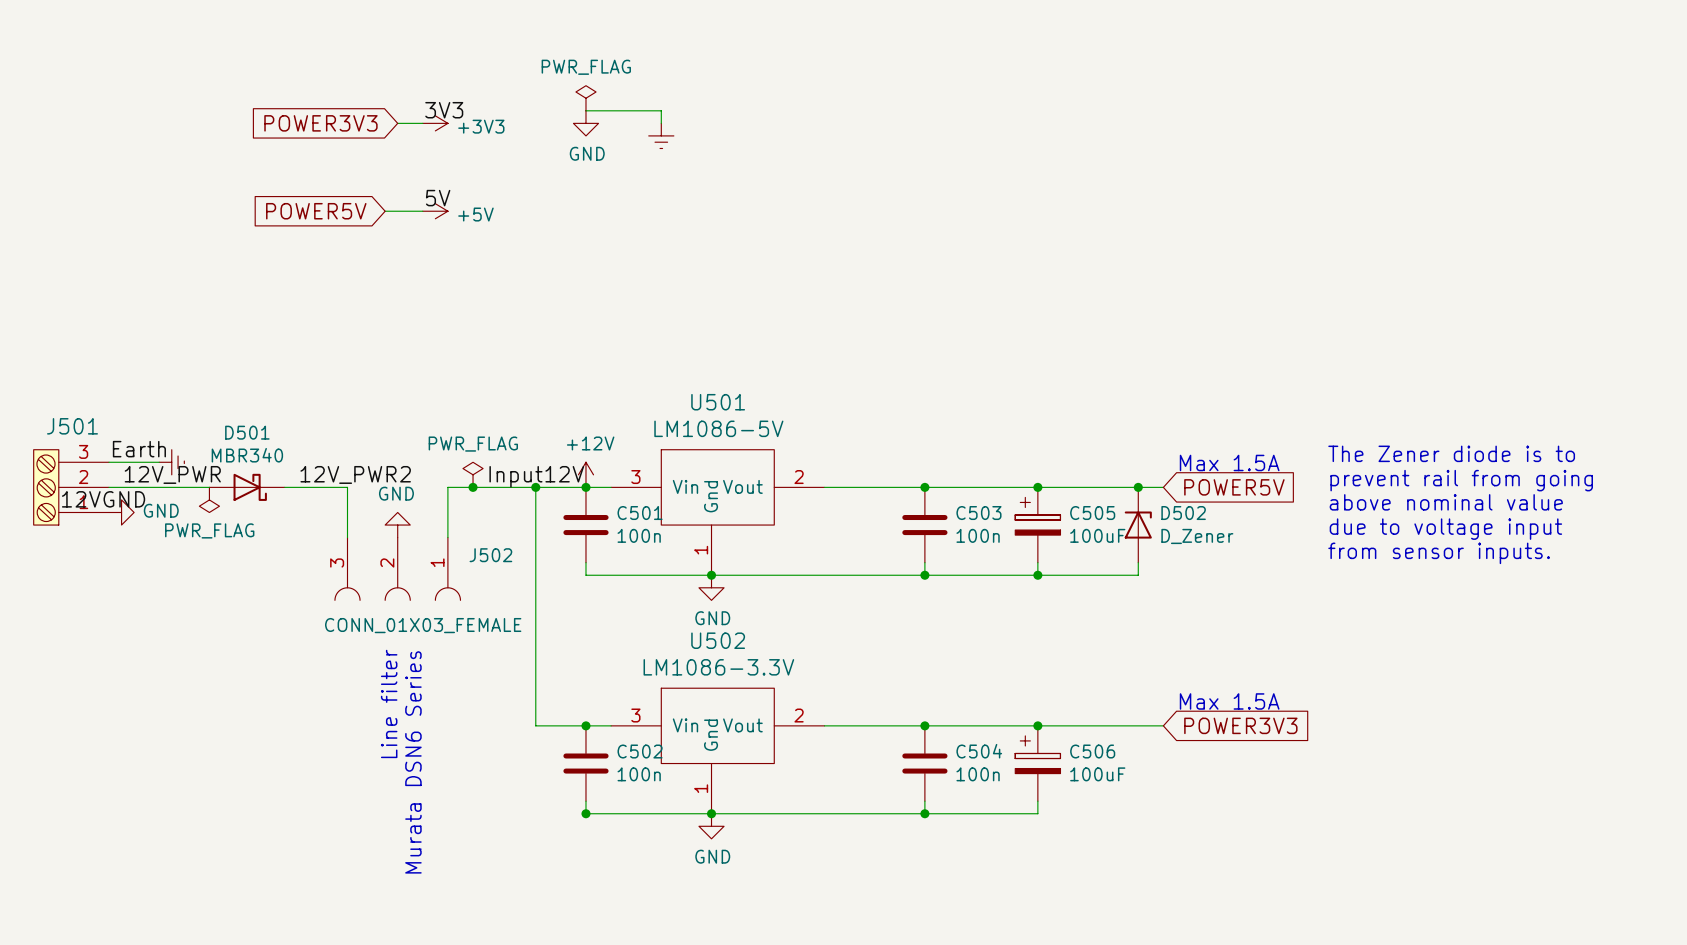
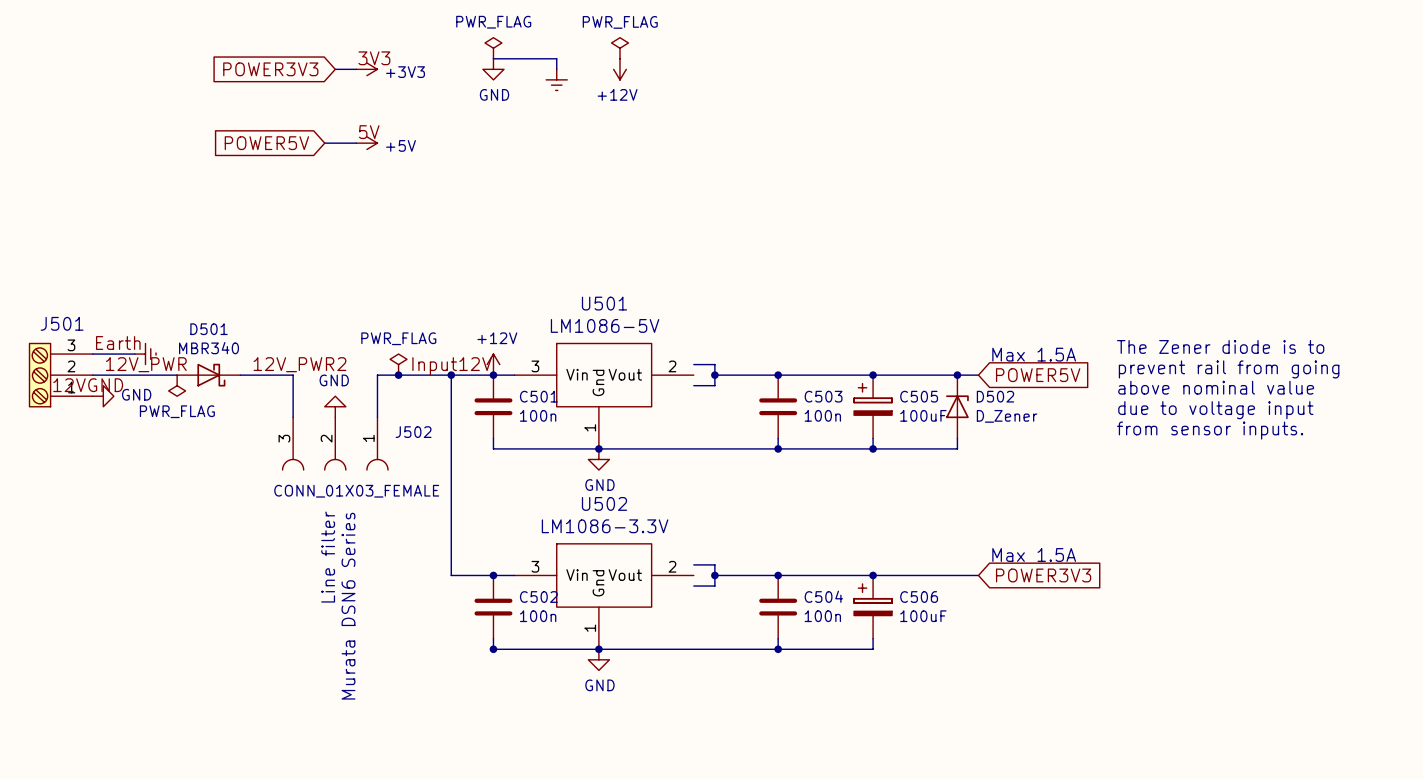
power symbol: none -> PWR_FLAG (619, 48)
power symbol: none -> +12V (619, 69)
wire: none -> (693, 364) (714, 364) (714, 385) (693, 385)
wire: (824, 487) (849, 487) -> none
junction: none -> (714, 375)
wire: none -> (693, 564) (714, 564) (714, 586) (693, 586)
wire: (824, 725) (849, 725) -> none
junction: none -> (714, 575)

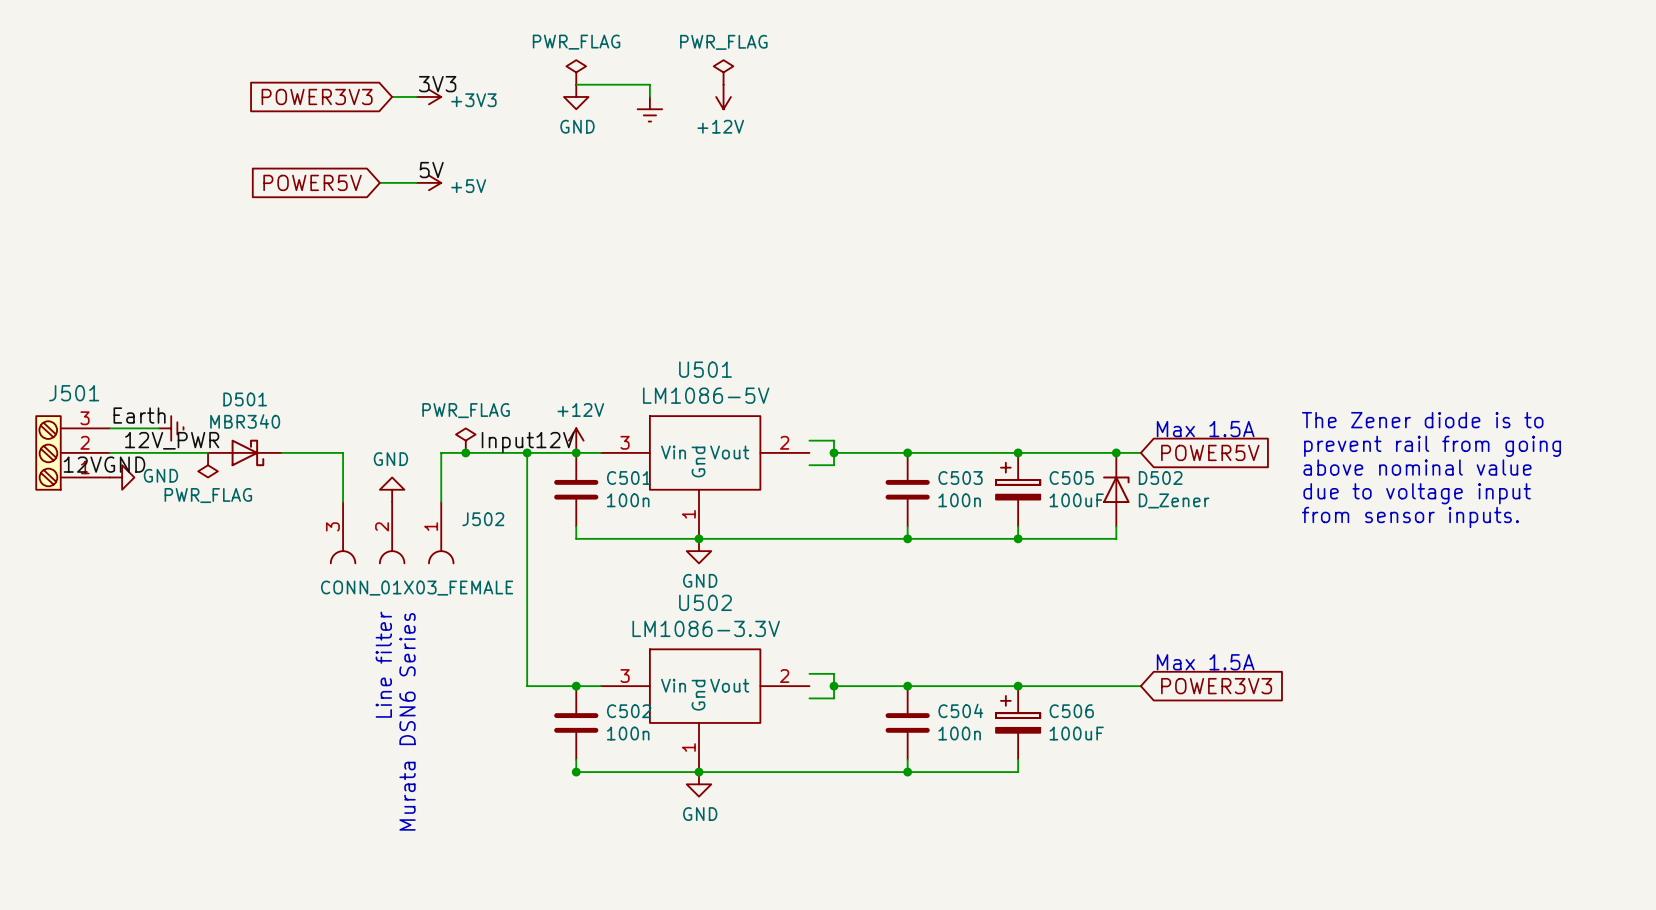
label: 12V_PWR2 (299, 364) -> none

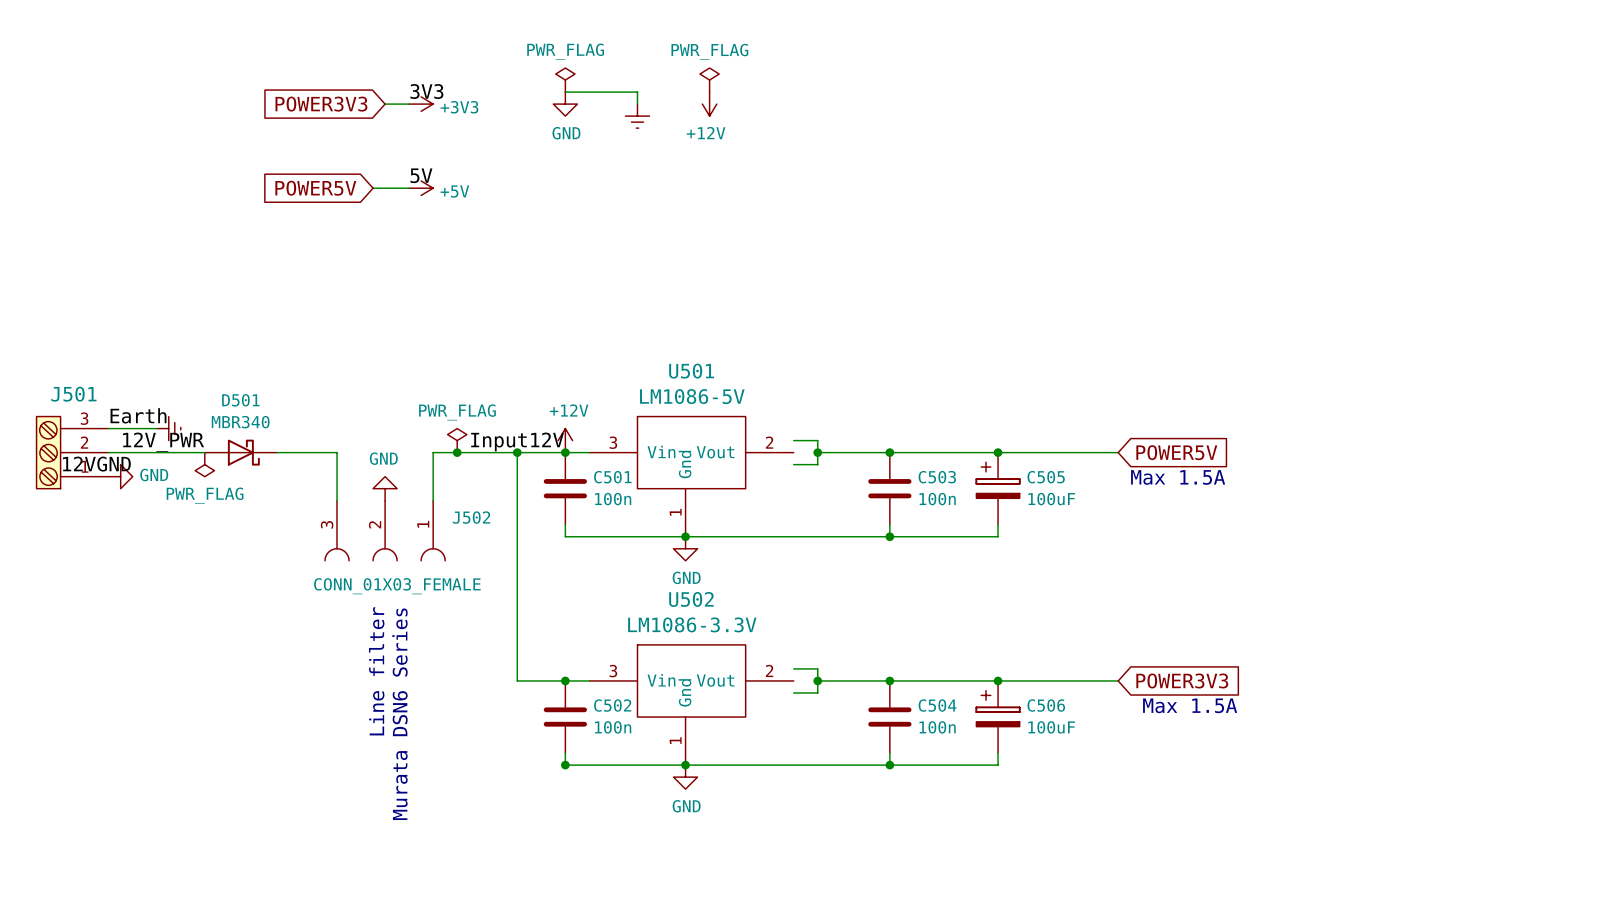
text: The Zener diode is to (1422, 420) -> none
text position: Max 1.5A (1205, 429) -> Max 1.5A (1178, 477)
text: prevent rail from going (1432, 446) -> none
junction: (1116, 452) -> none
text: above nominal value (1417, 467) -> none
D502: D_Zener (1116, 489) -> none
text: due to voltage input (1417, 493) -> none
text: from sensor inputs. (1410, 517) -> none
wire: (1116, 526) (1116, 538) (1018, 538) -> none
junction: (1018, 538) -> none
text position: Max 1.5A (1205, 662) -> Max 1.5A (1190, 705)

